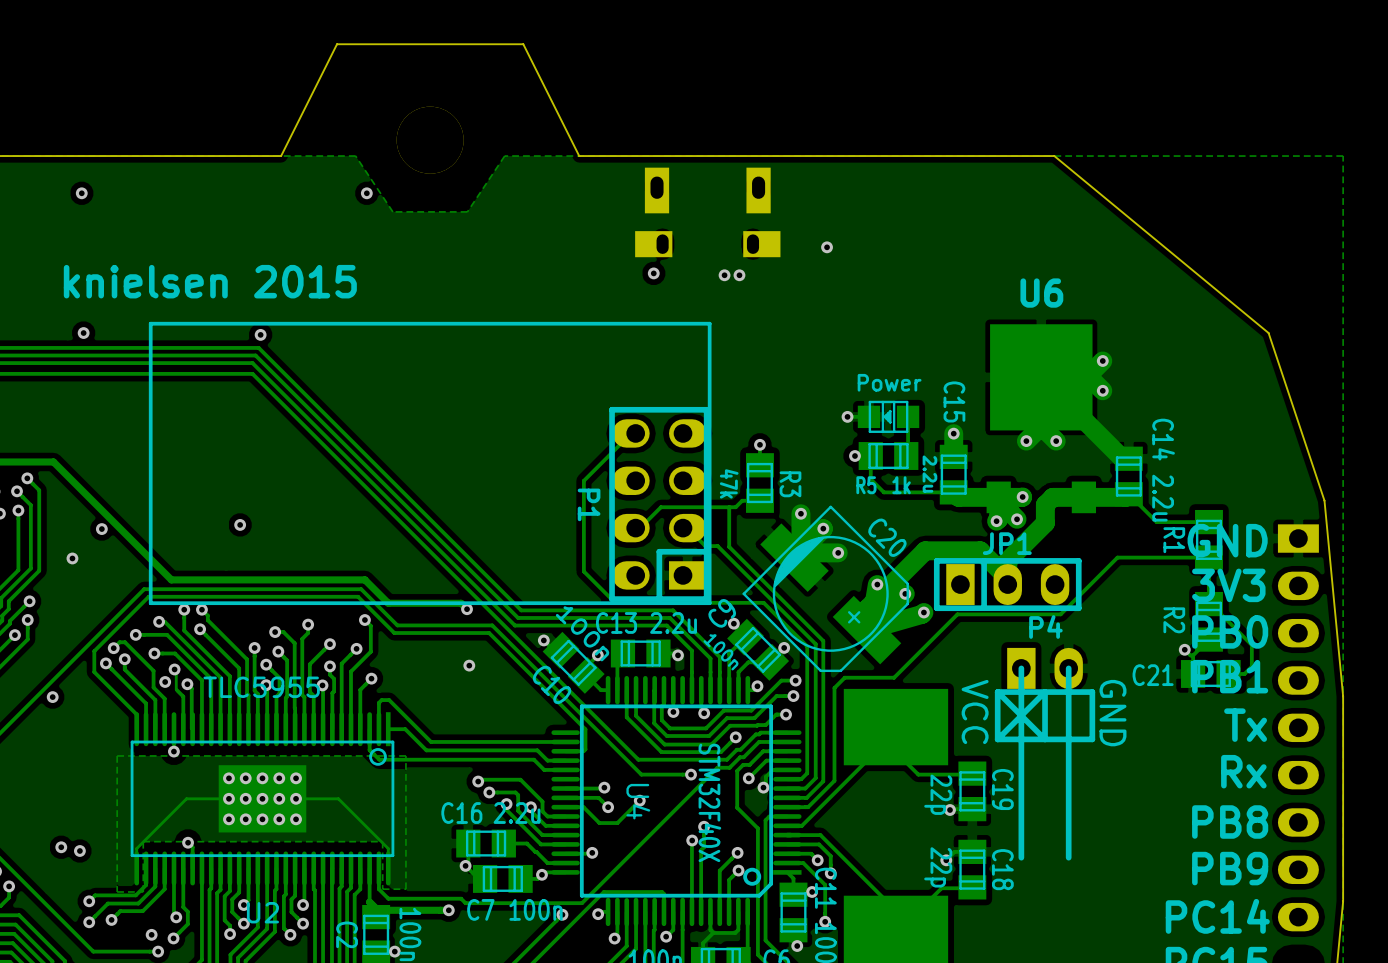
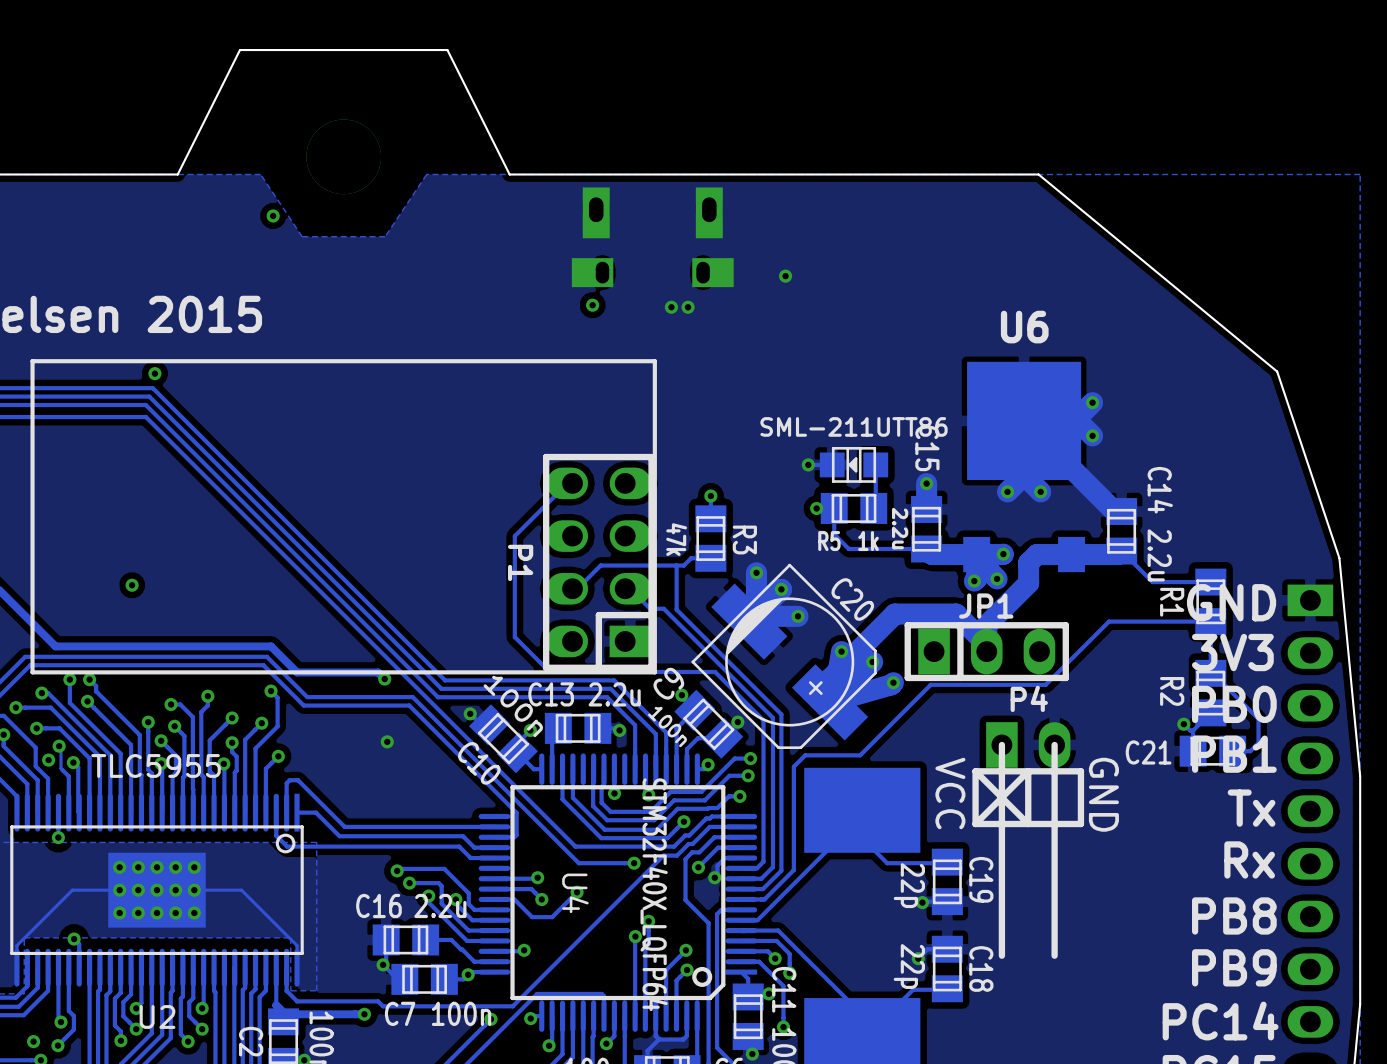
part value: Power (889, 382) -> SML-211UTT86 (854, 426)
U4 value: STM32F40X (709, 802) -> STM32F40X_LQFP64 (654, 894)

